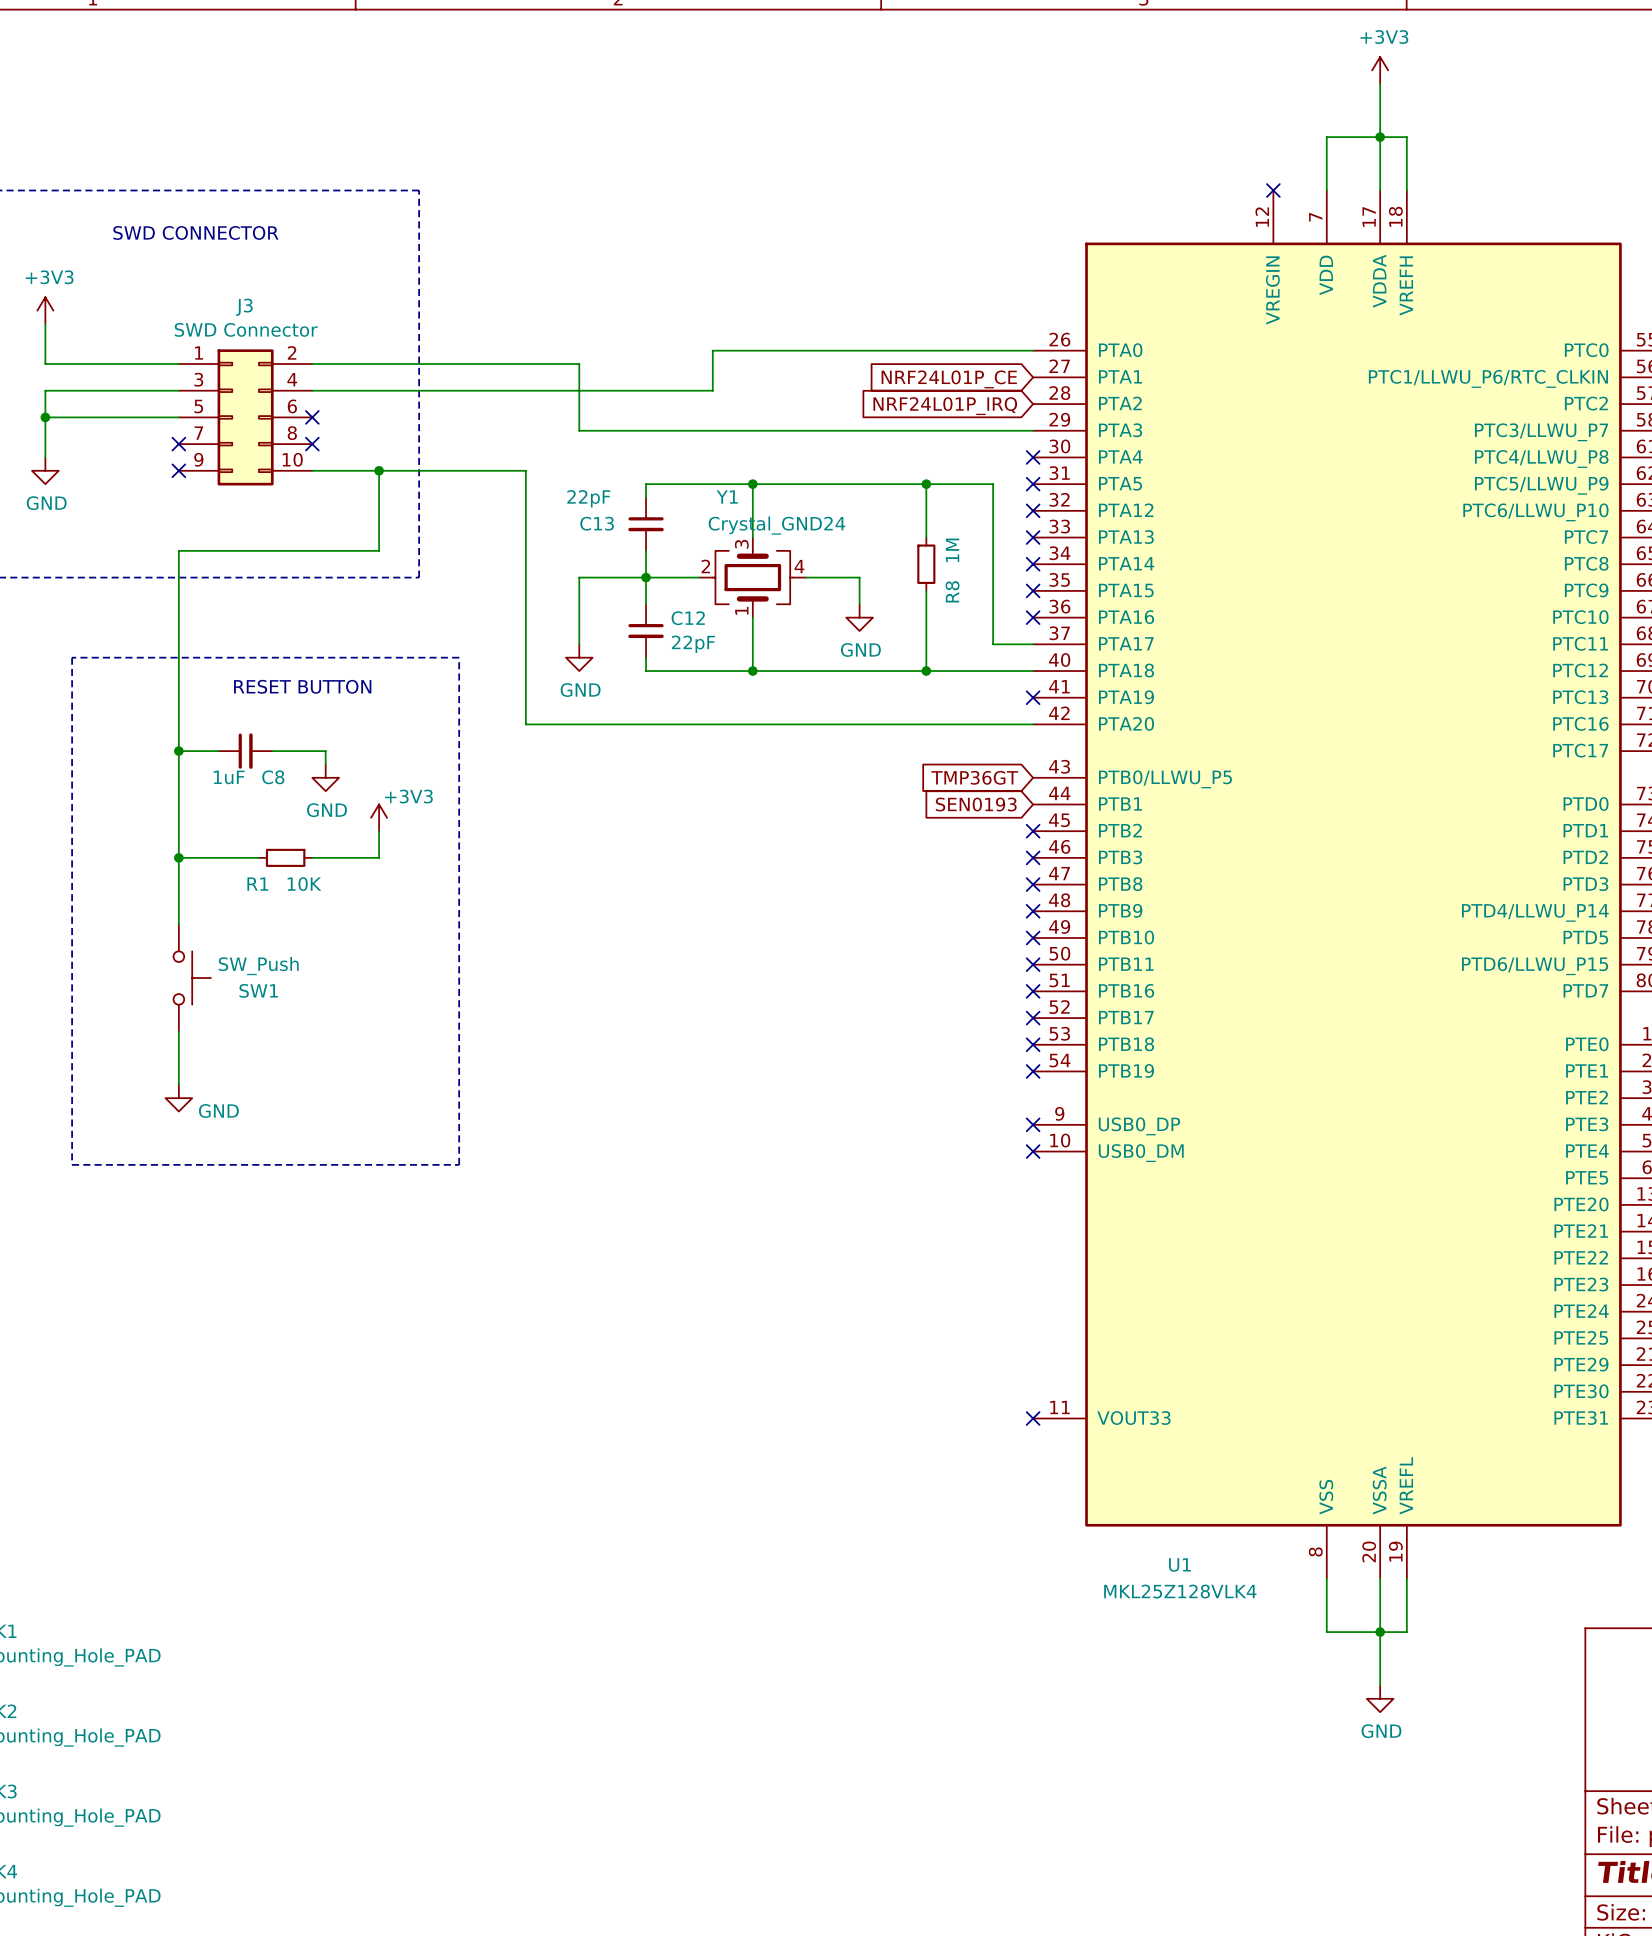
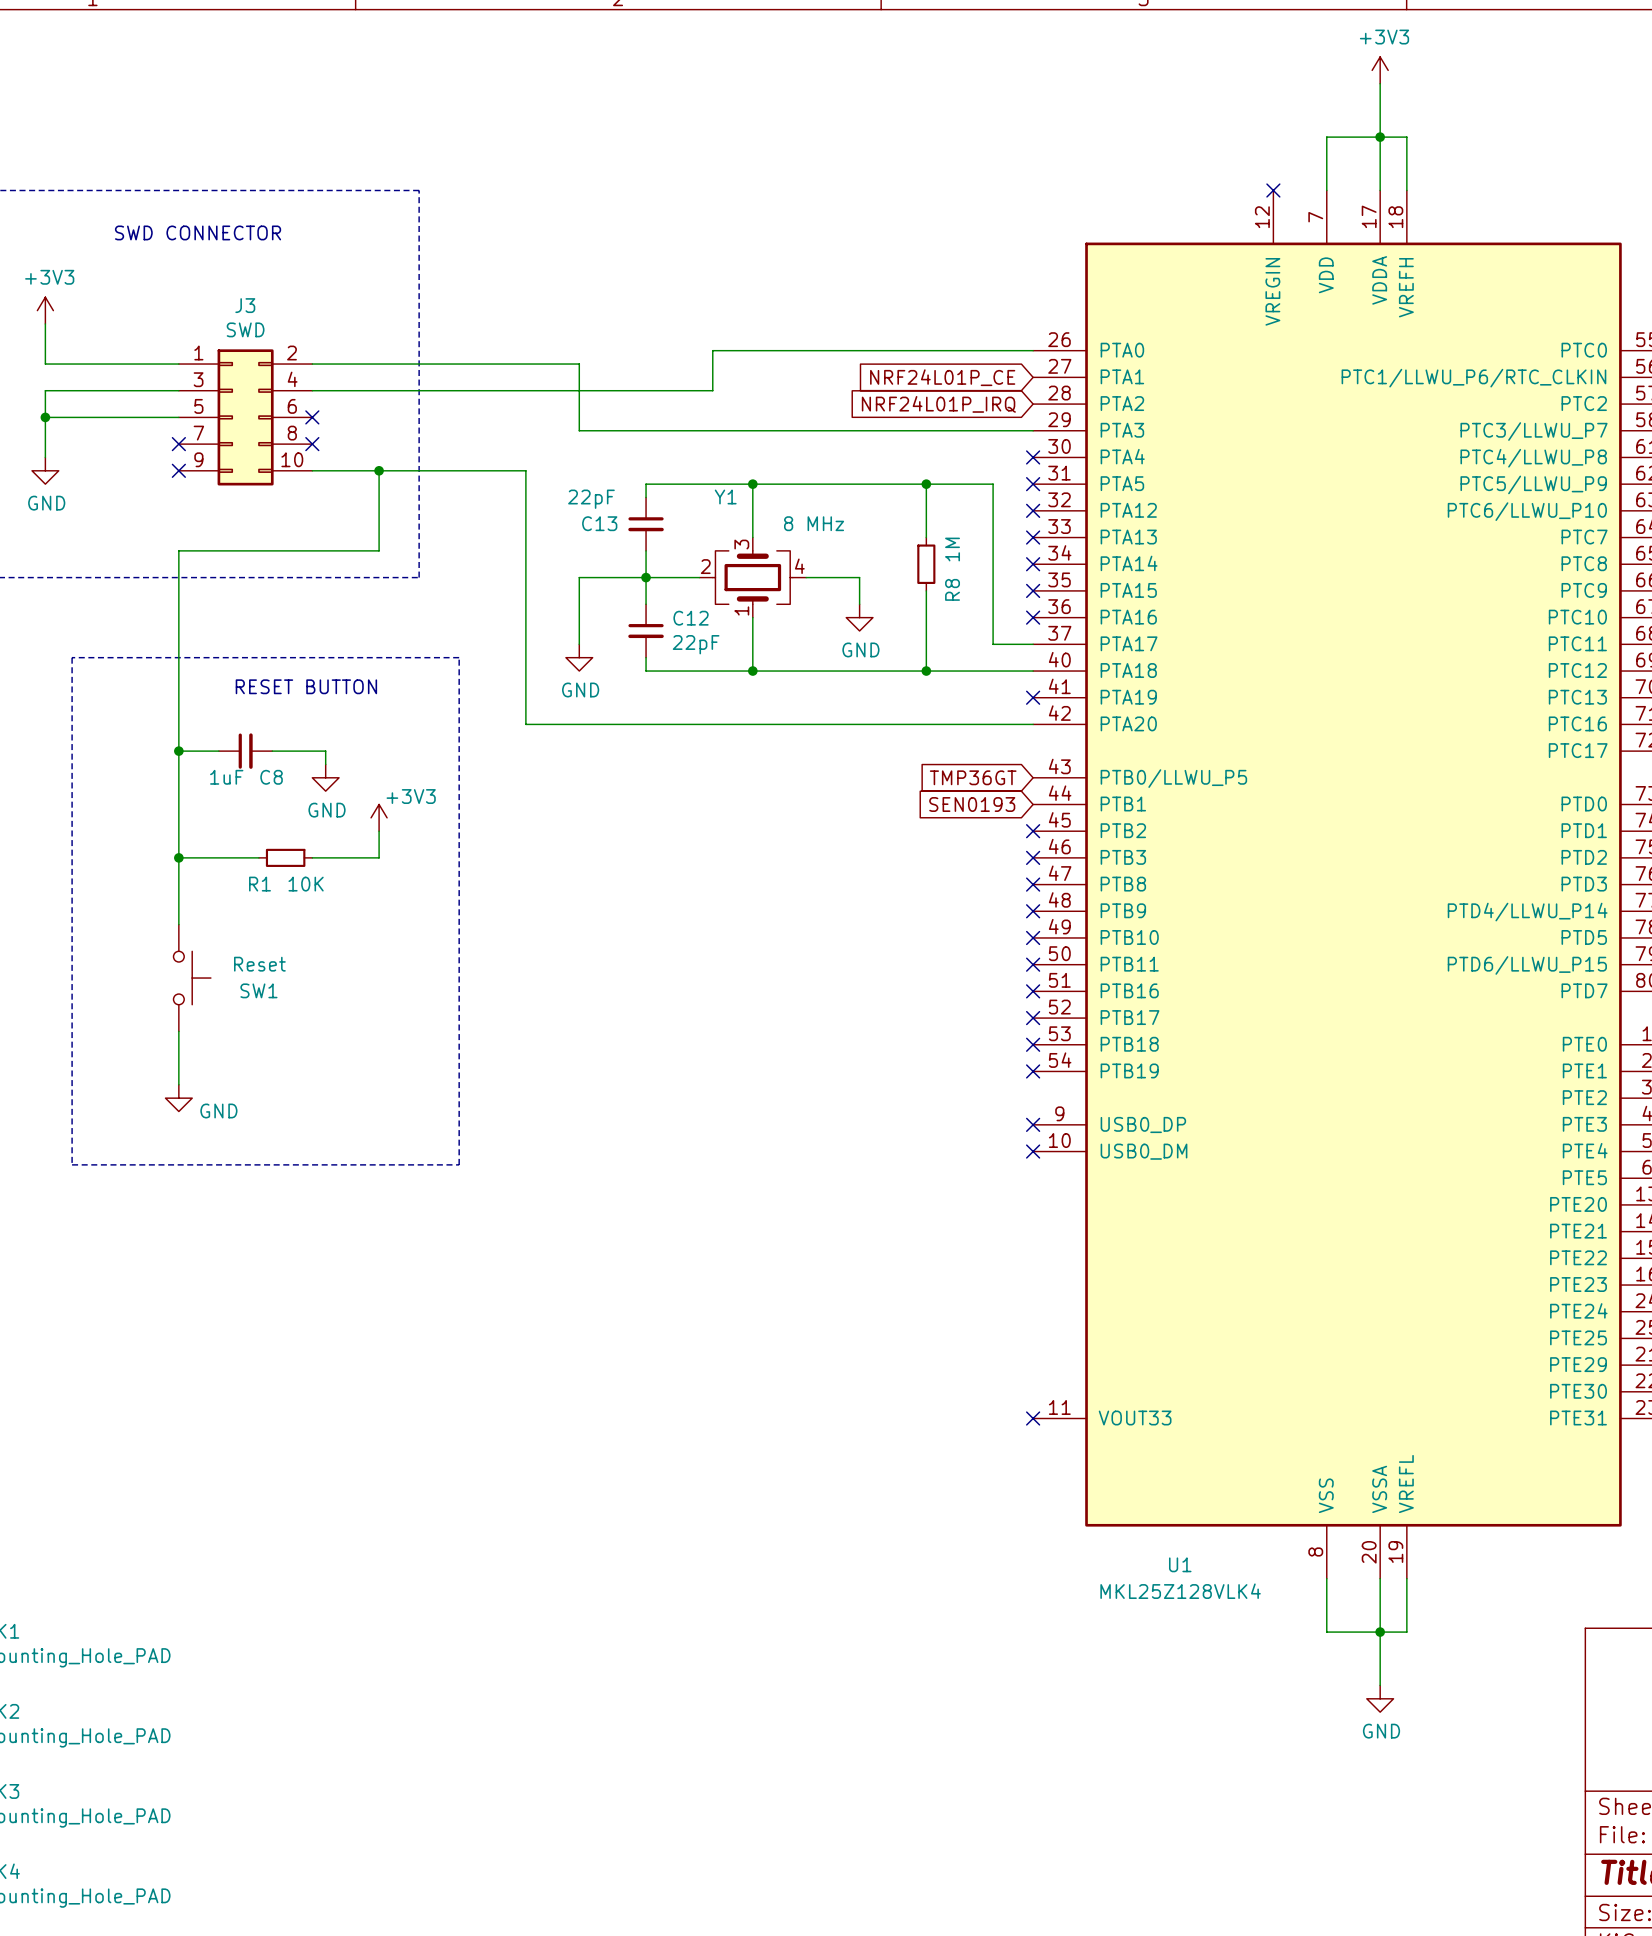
J3 value: SWD Connector (246, 329) -> SWD (245, 329)
Y1 value: Crystal_GND24 (776, 525) -> 8 MHz (814, 523)
SW1 value: SW_Push (258, 966) -> Reset (259, 964)

